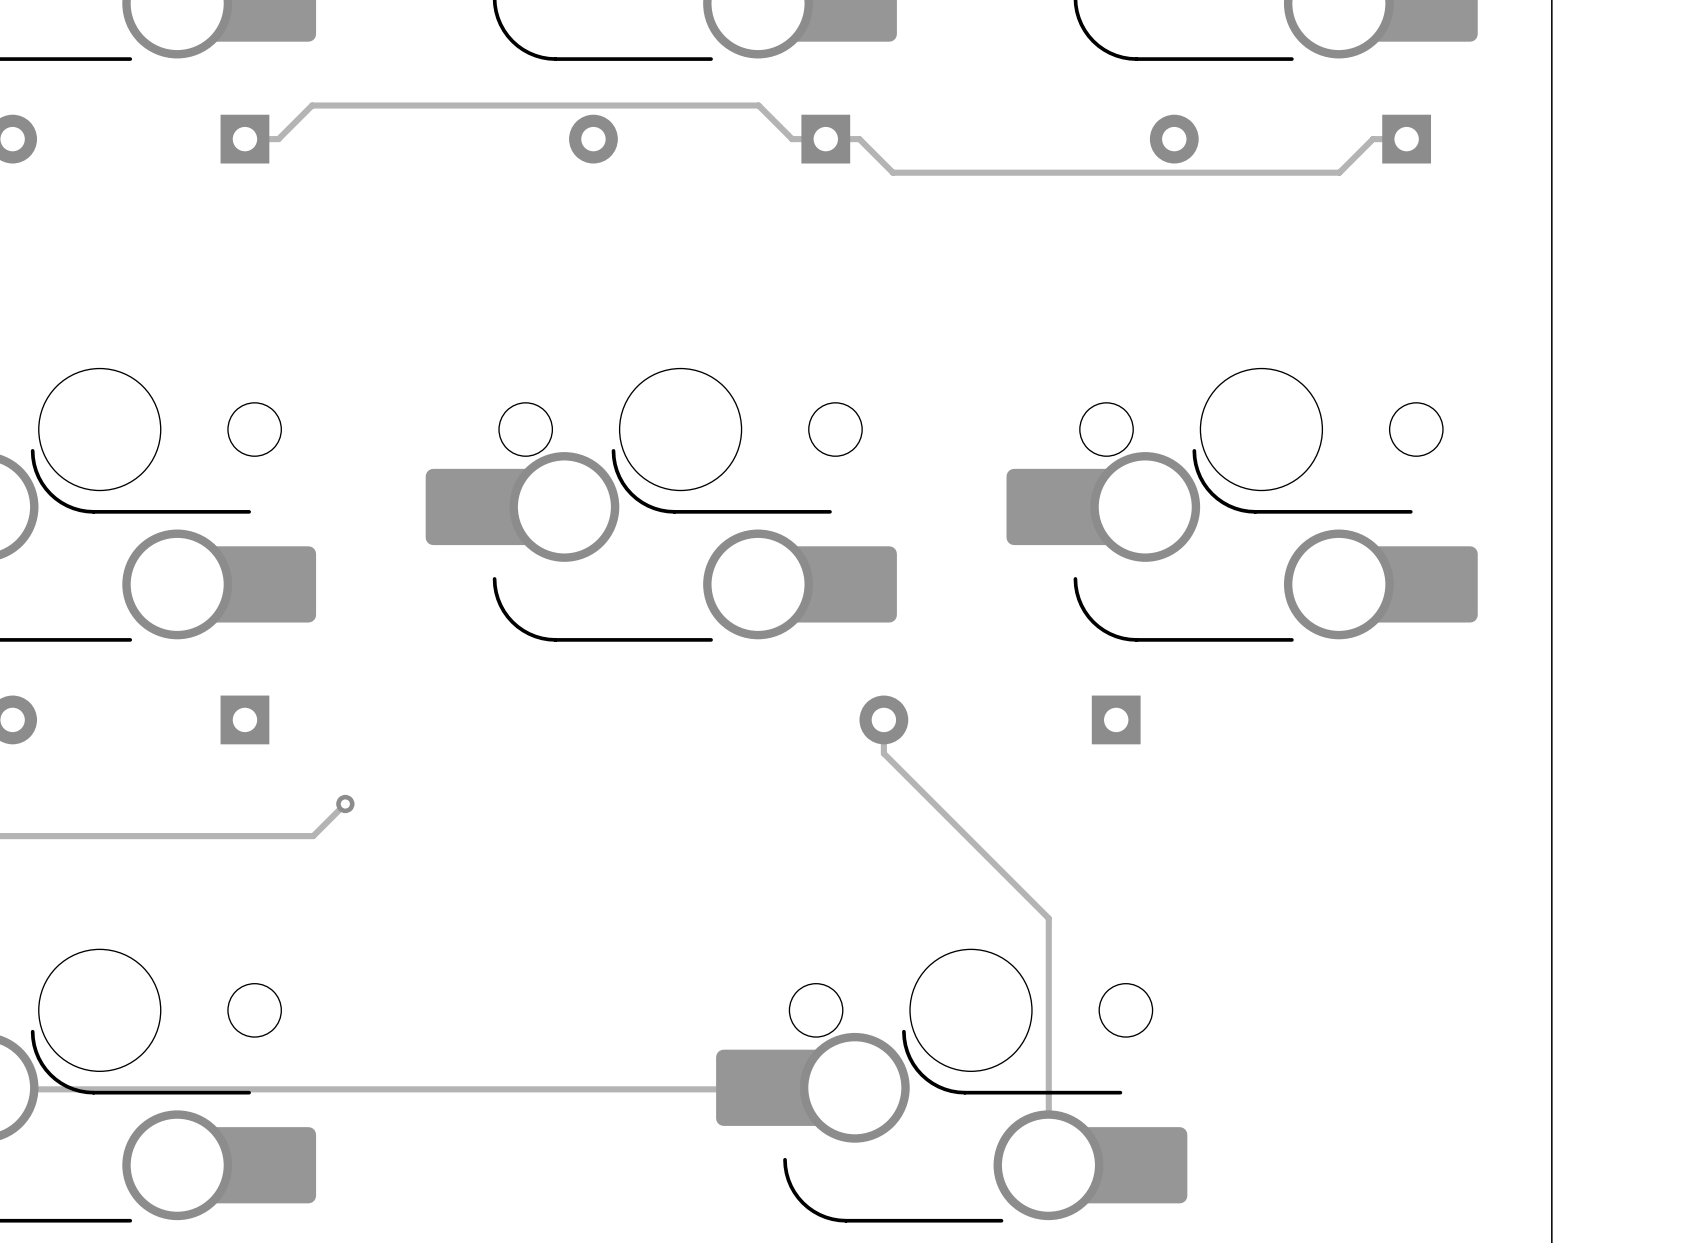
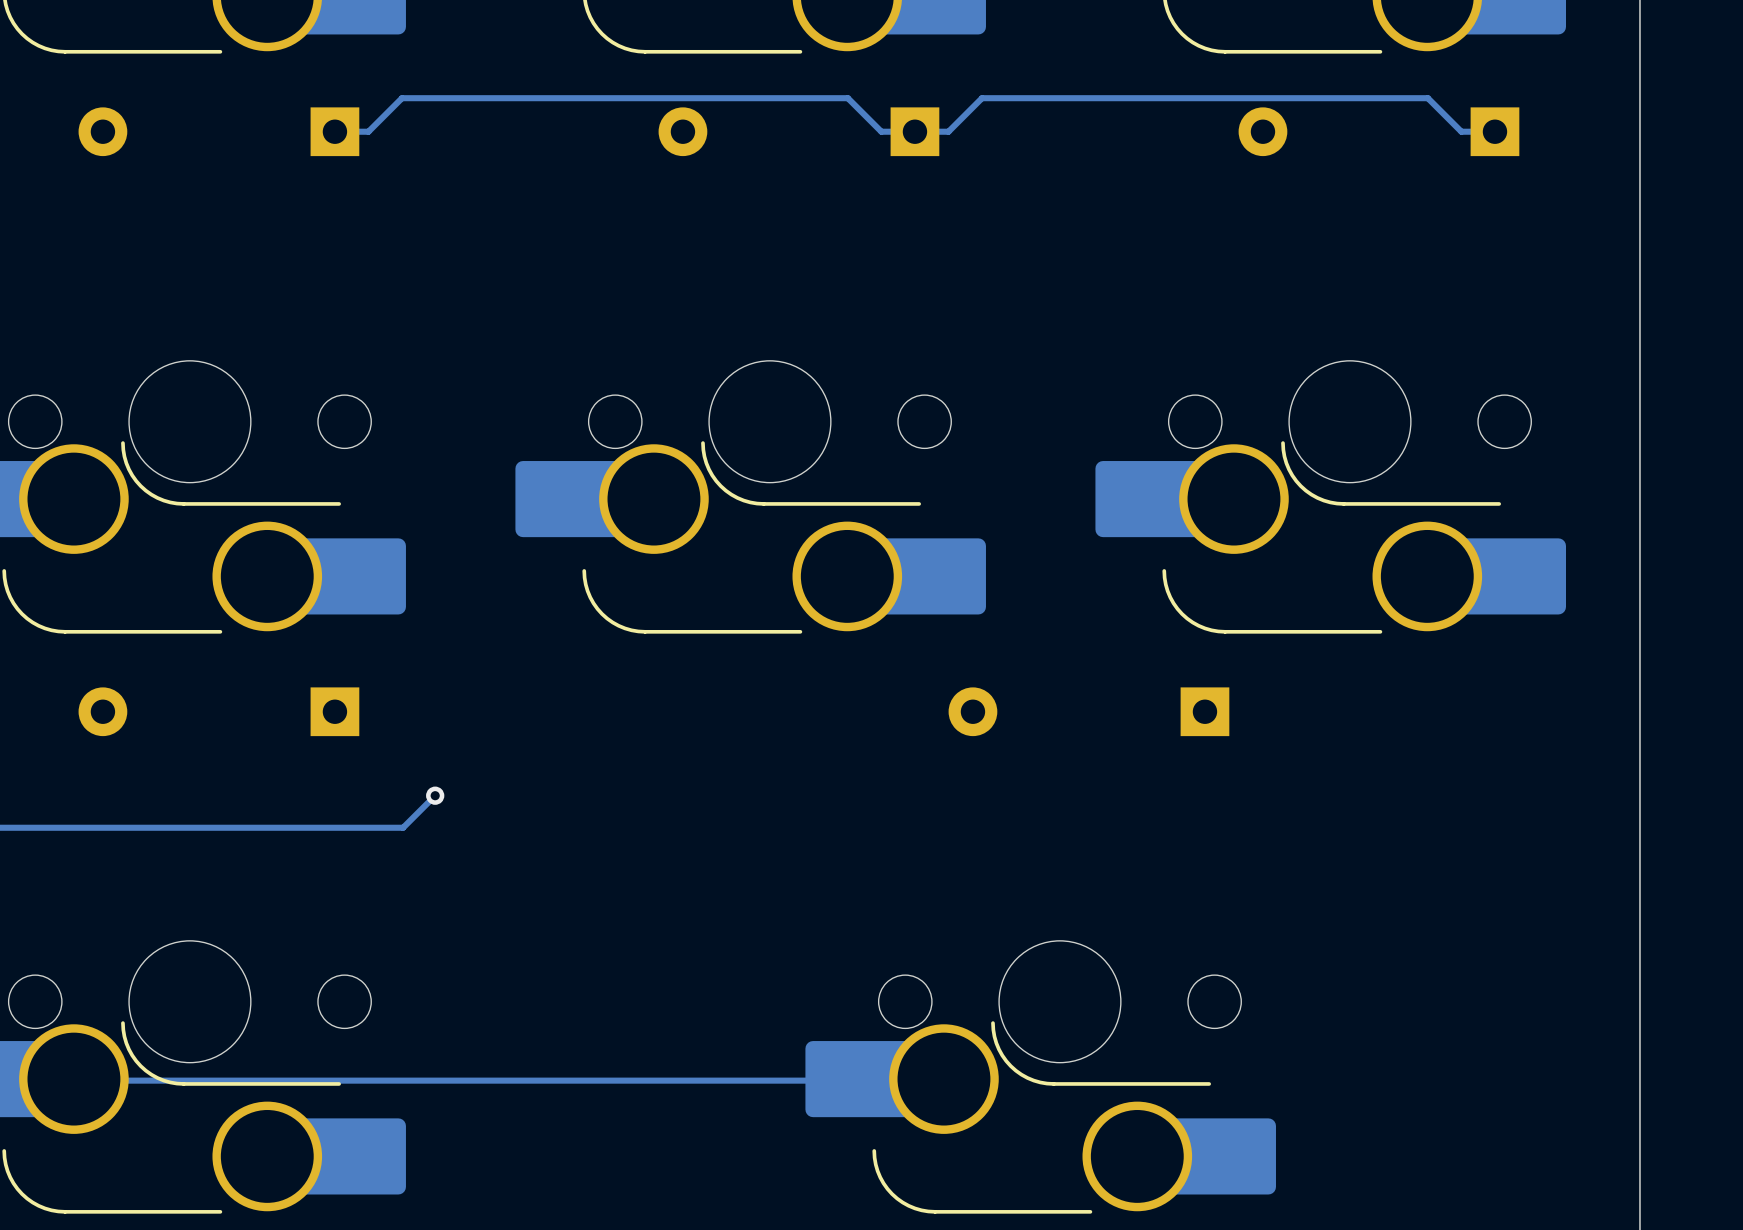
track: (1373, 139) (1339, 172) (892, 172) (859, 139) -> (1461, 131) (1427, 98) (982, 98) (948, 131)
track: (883, 719) (883, 753) (1048, 918) (1048, 1164) -> none

